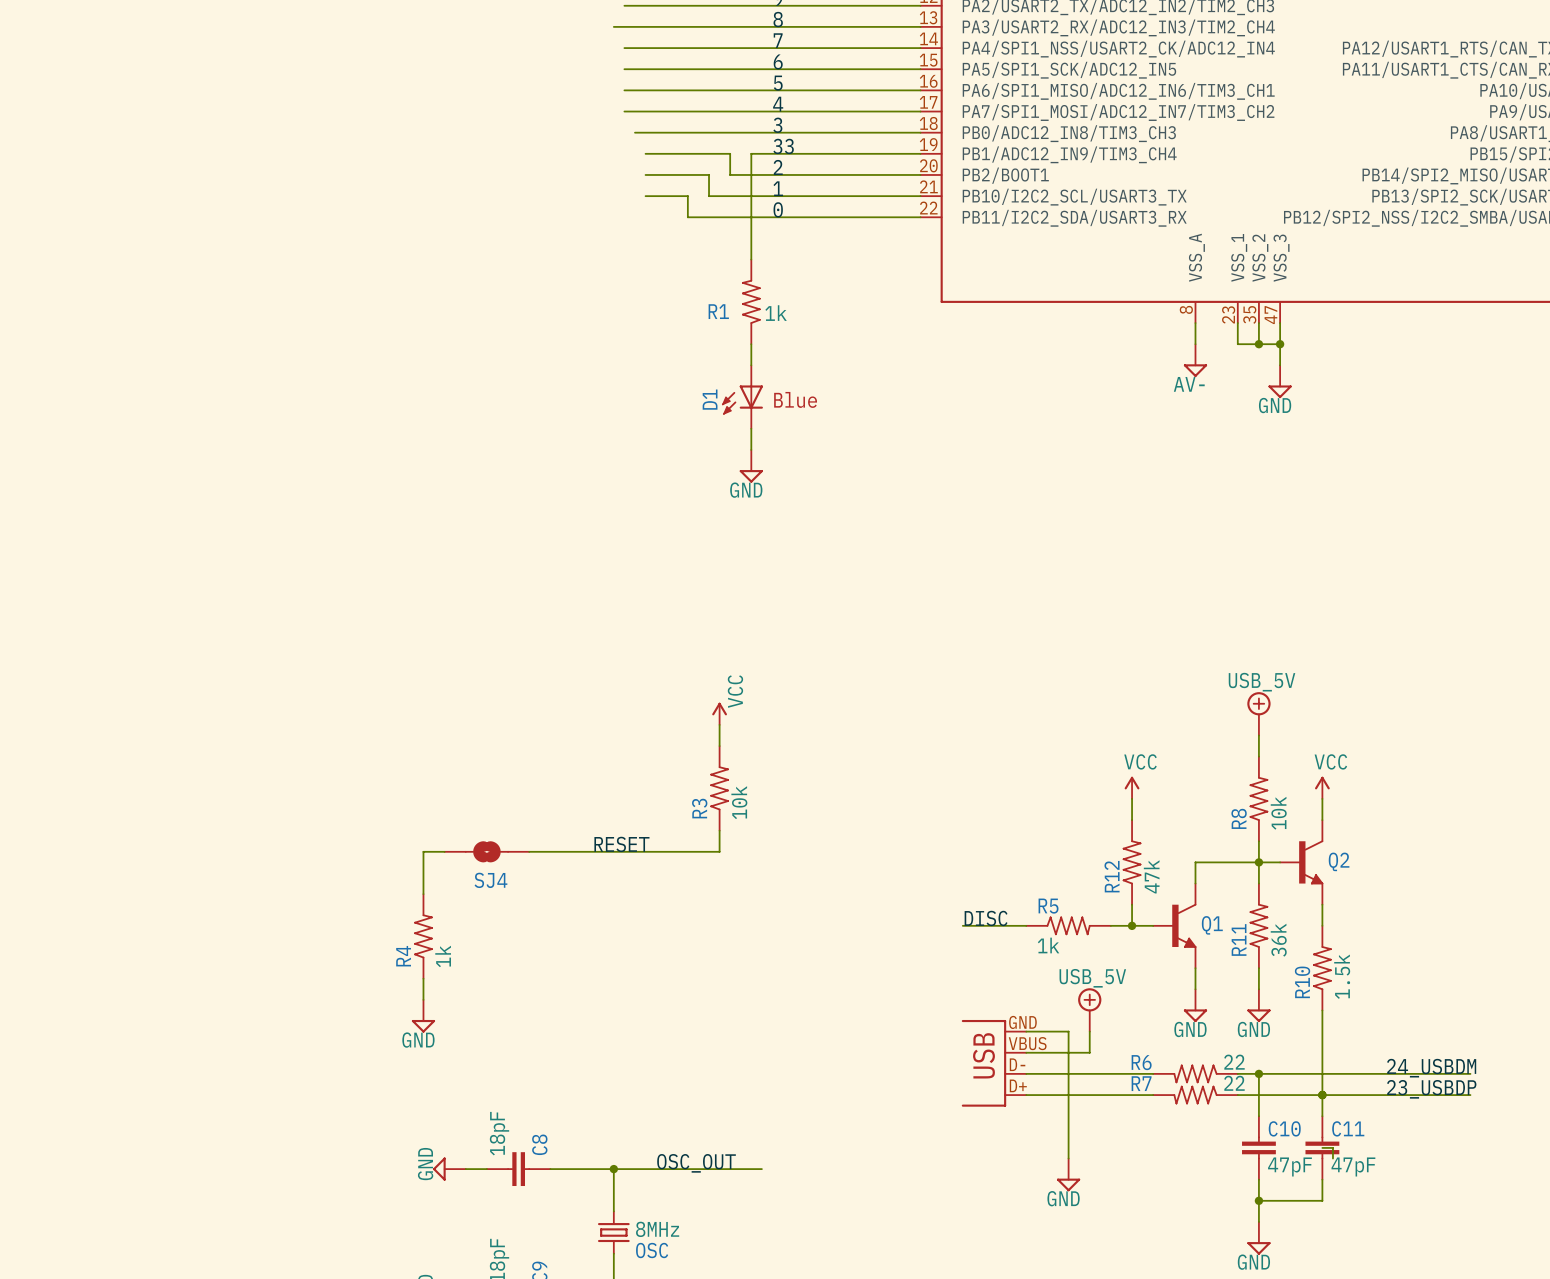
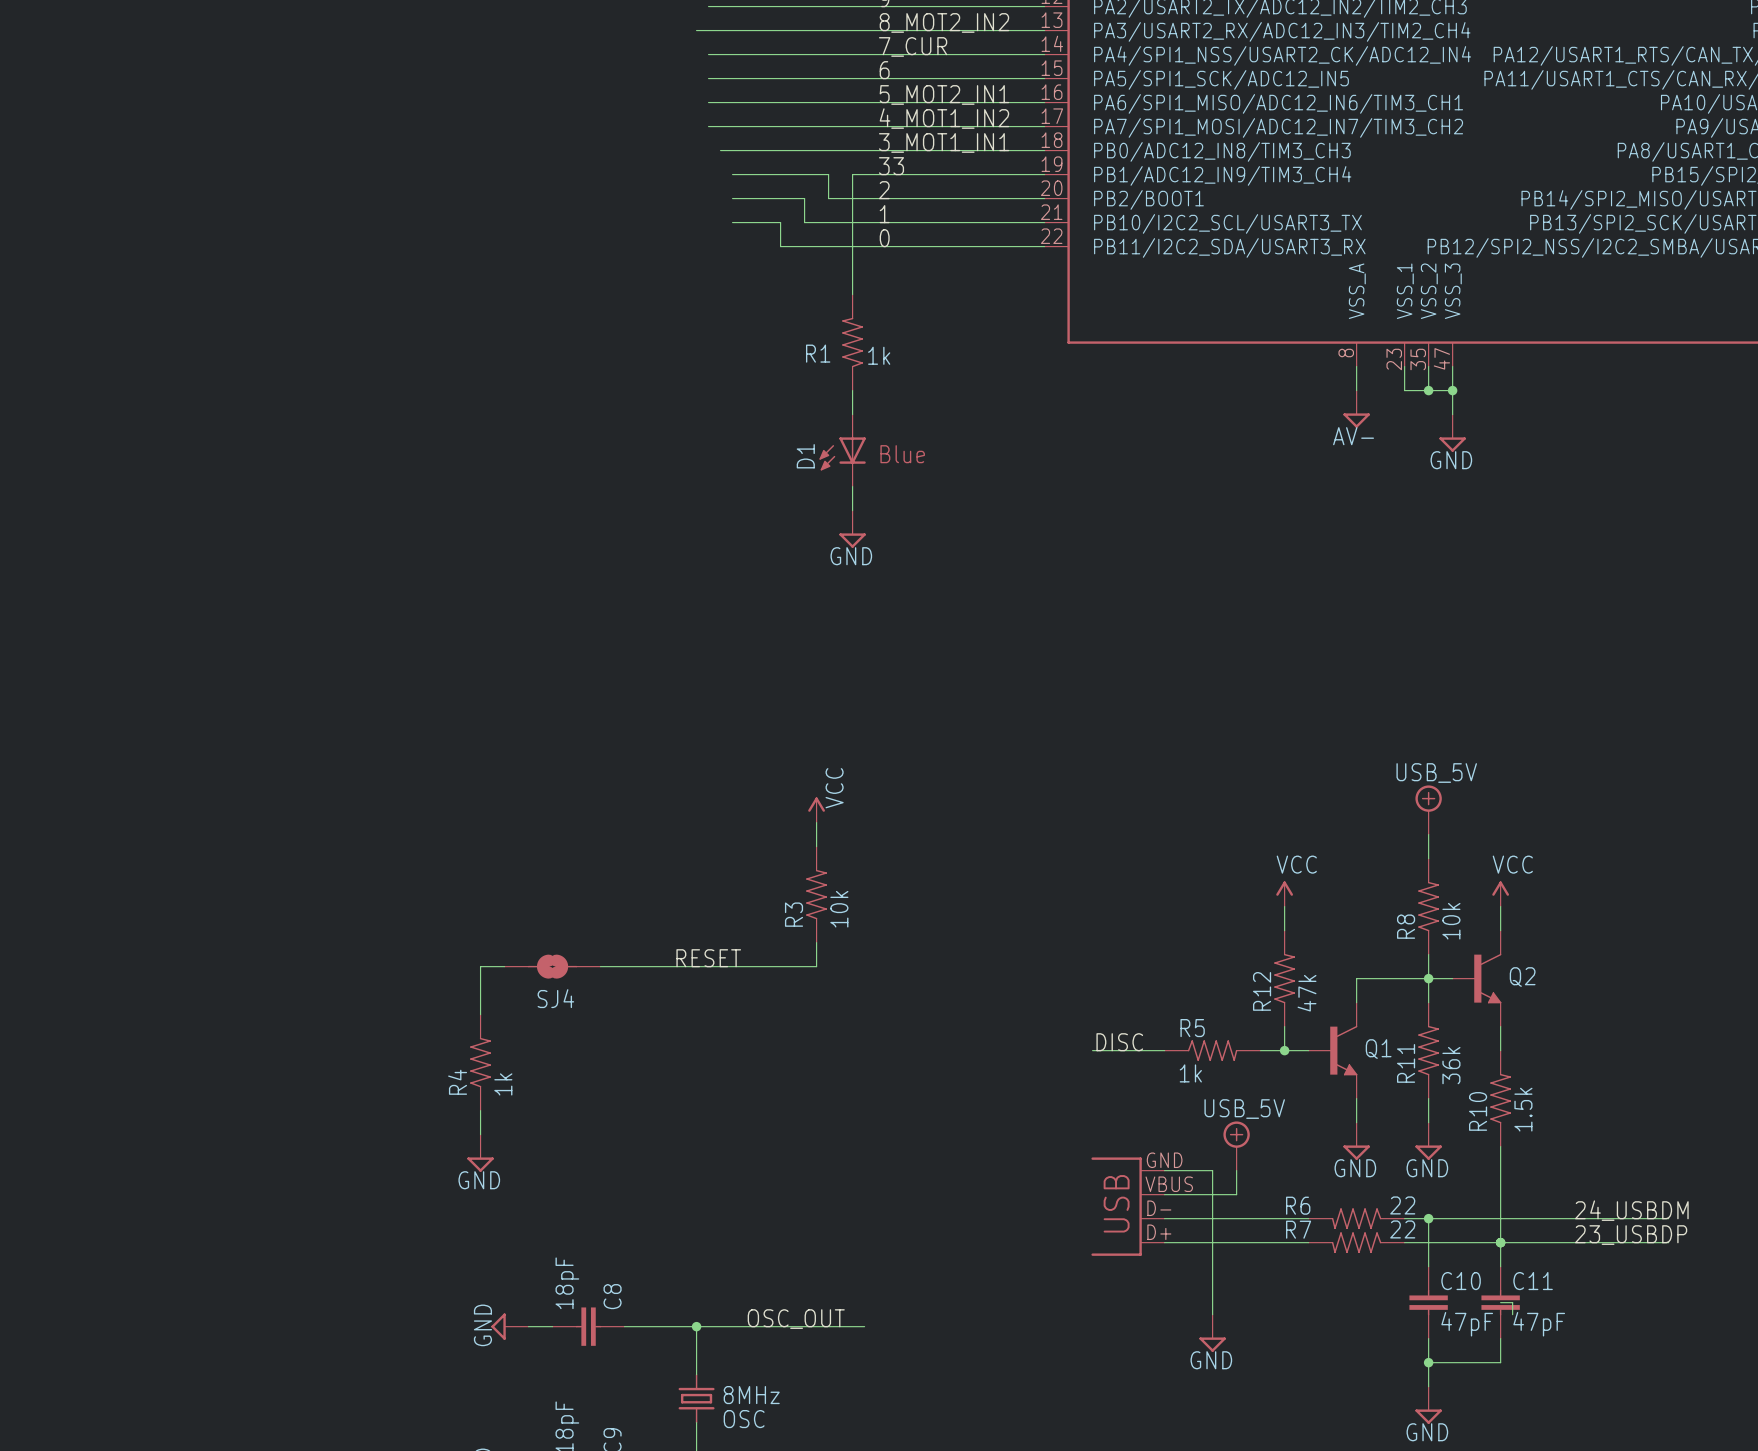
label: 8 (778, 19) -> 8_MOT2_IN2 (944, 22)
label: 7 (778, 40) -> 7_CUR (913, 46)
label: 5 (778, 83) -> 5_MOT2_IN1 (944, 94)
label: 4 (778, 104) -> 4_MOT1_IN2 (944, 118)
label: 3 (777, 125) -> 3_MOT1_IN1 (944, 142)

